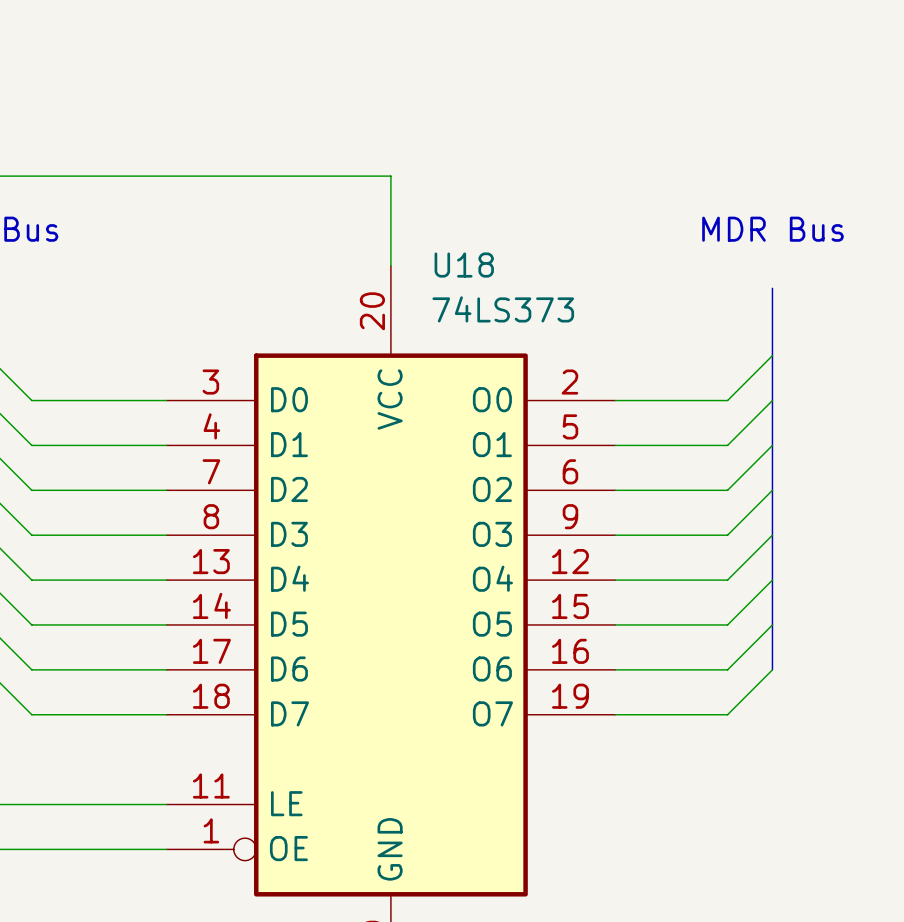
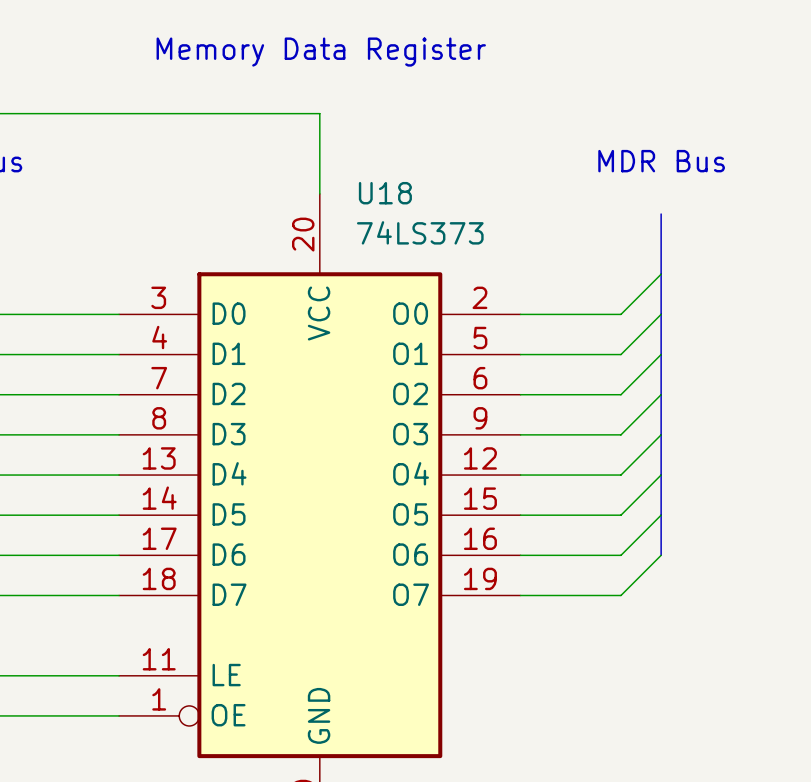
text: none -> Memory Data Register (321, 52)

